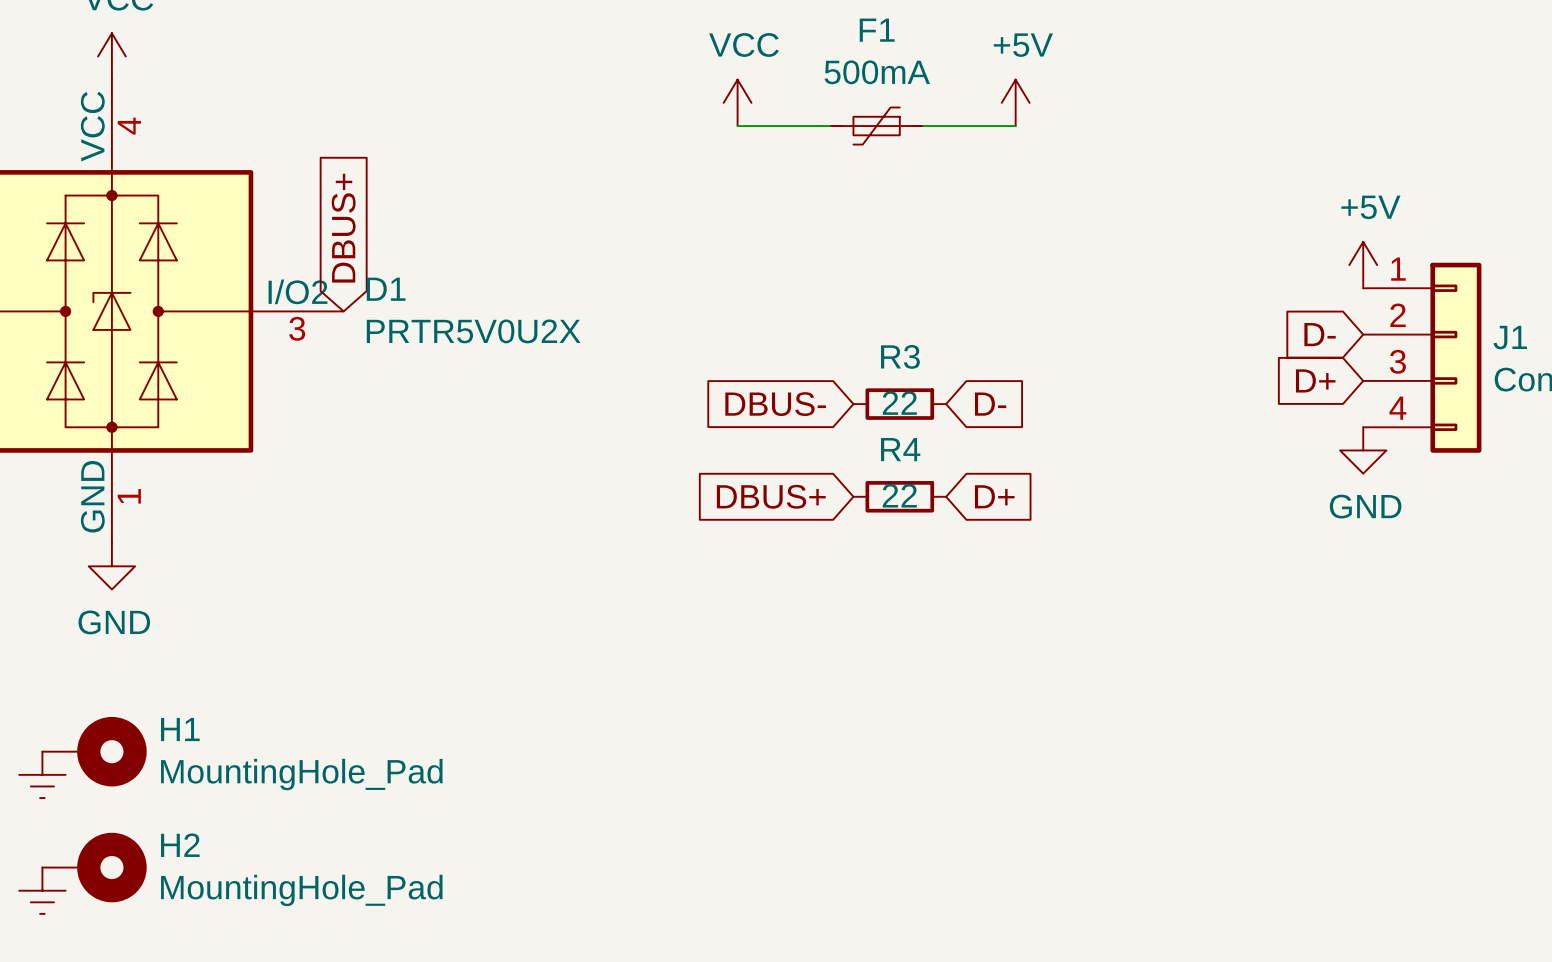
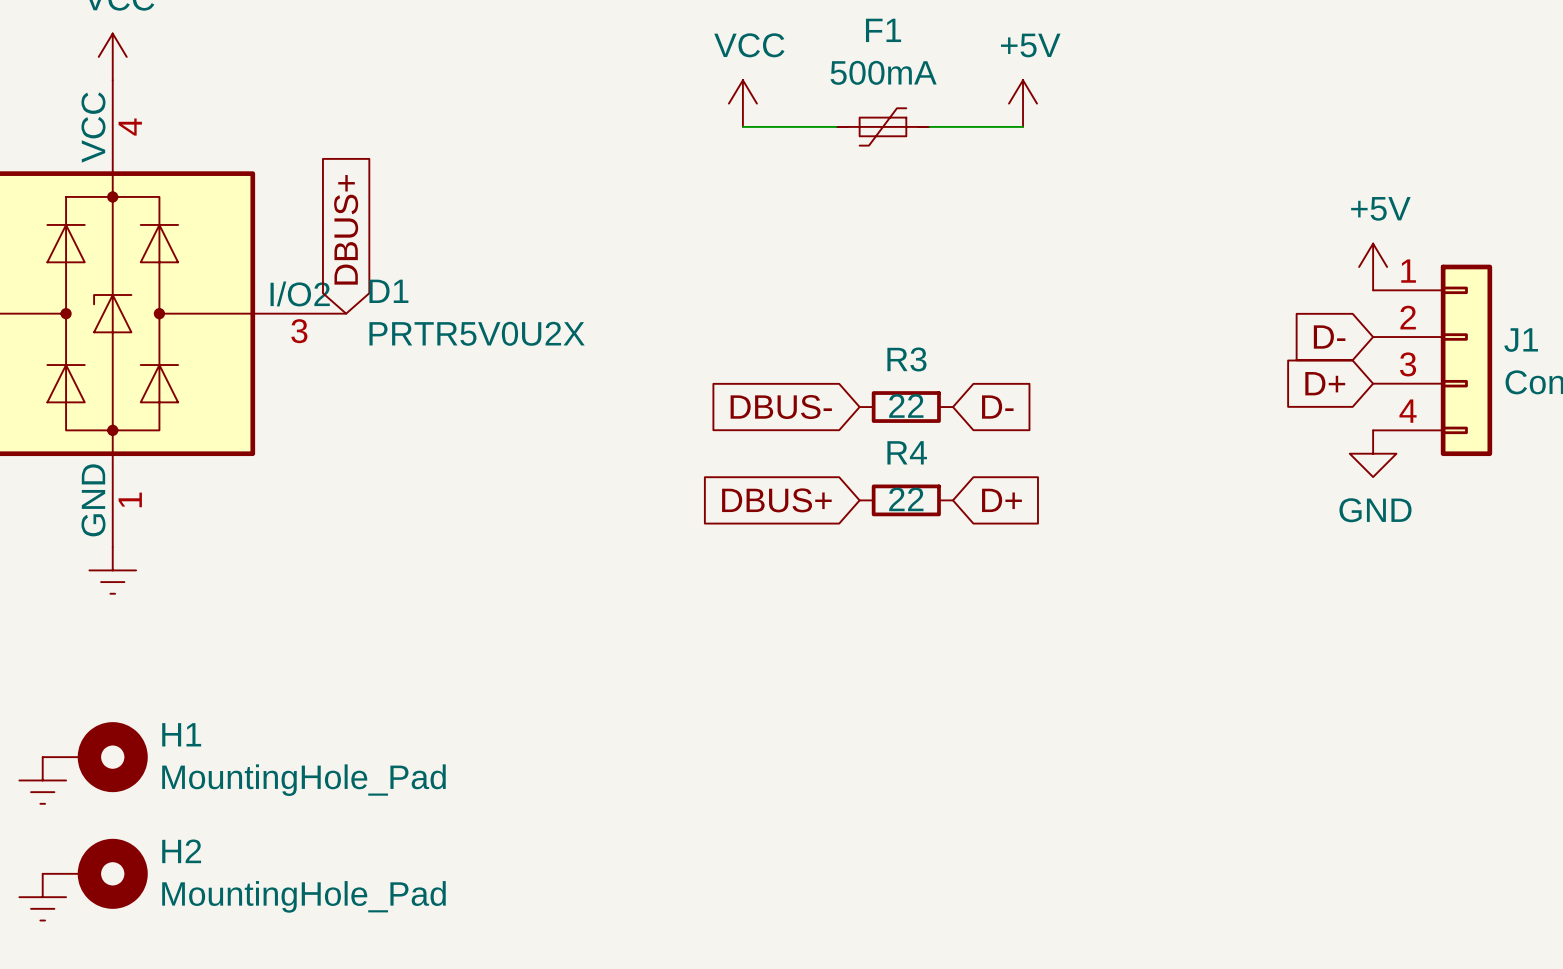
power symbol shape: [88, 543, 136, 590] -> [89, 547, 137, 594]
power symbol text: GND (114, 622) -> none

